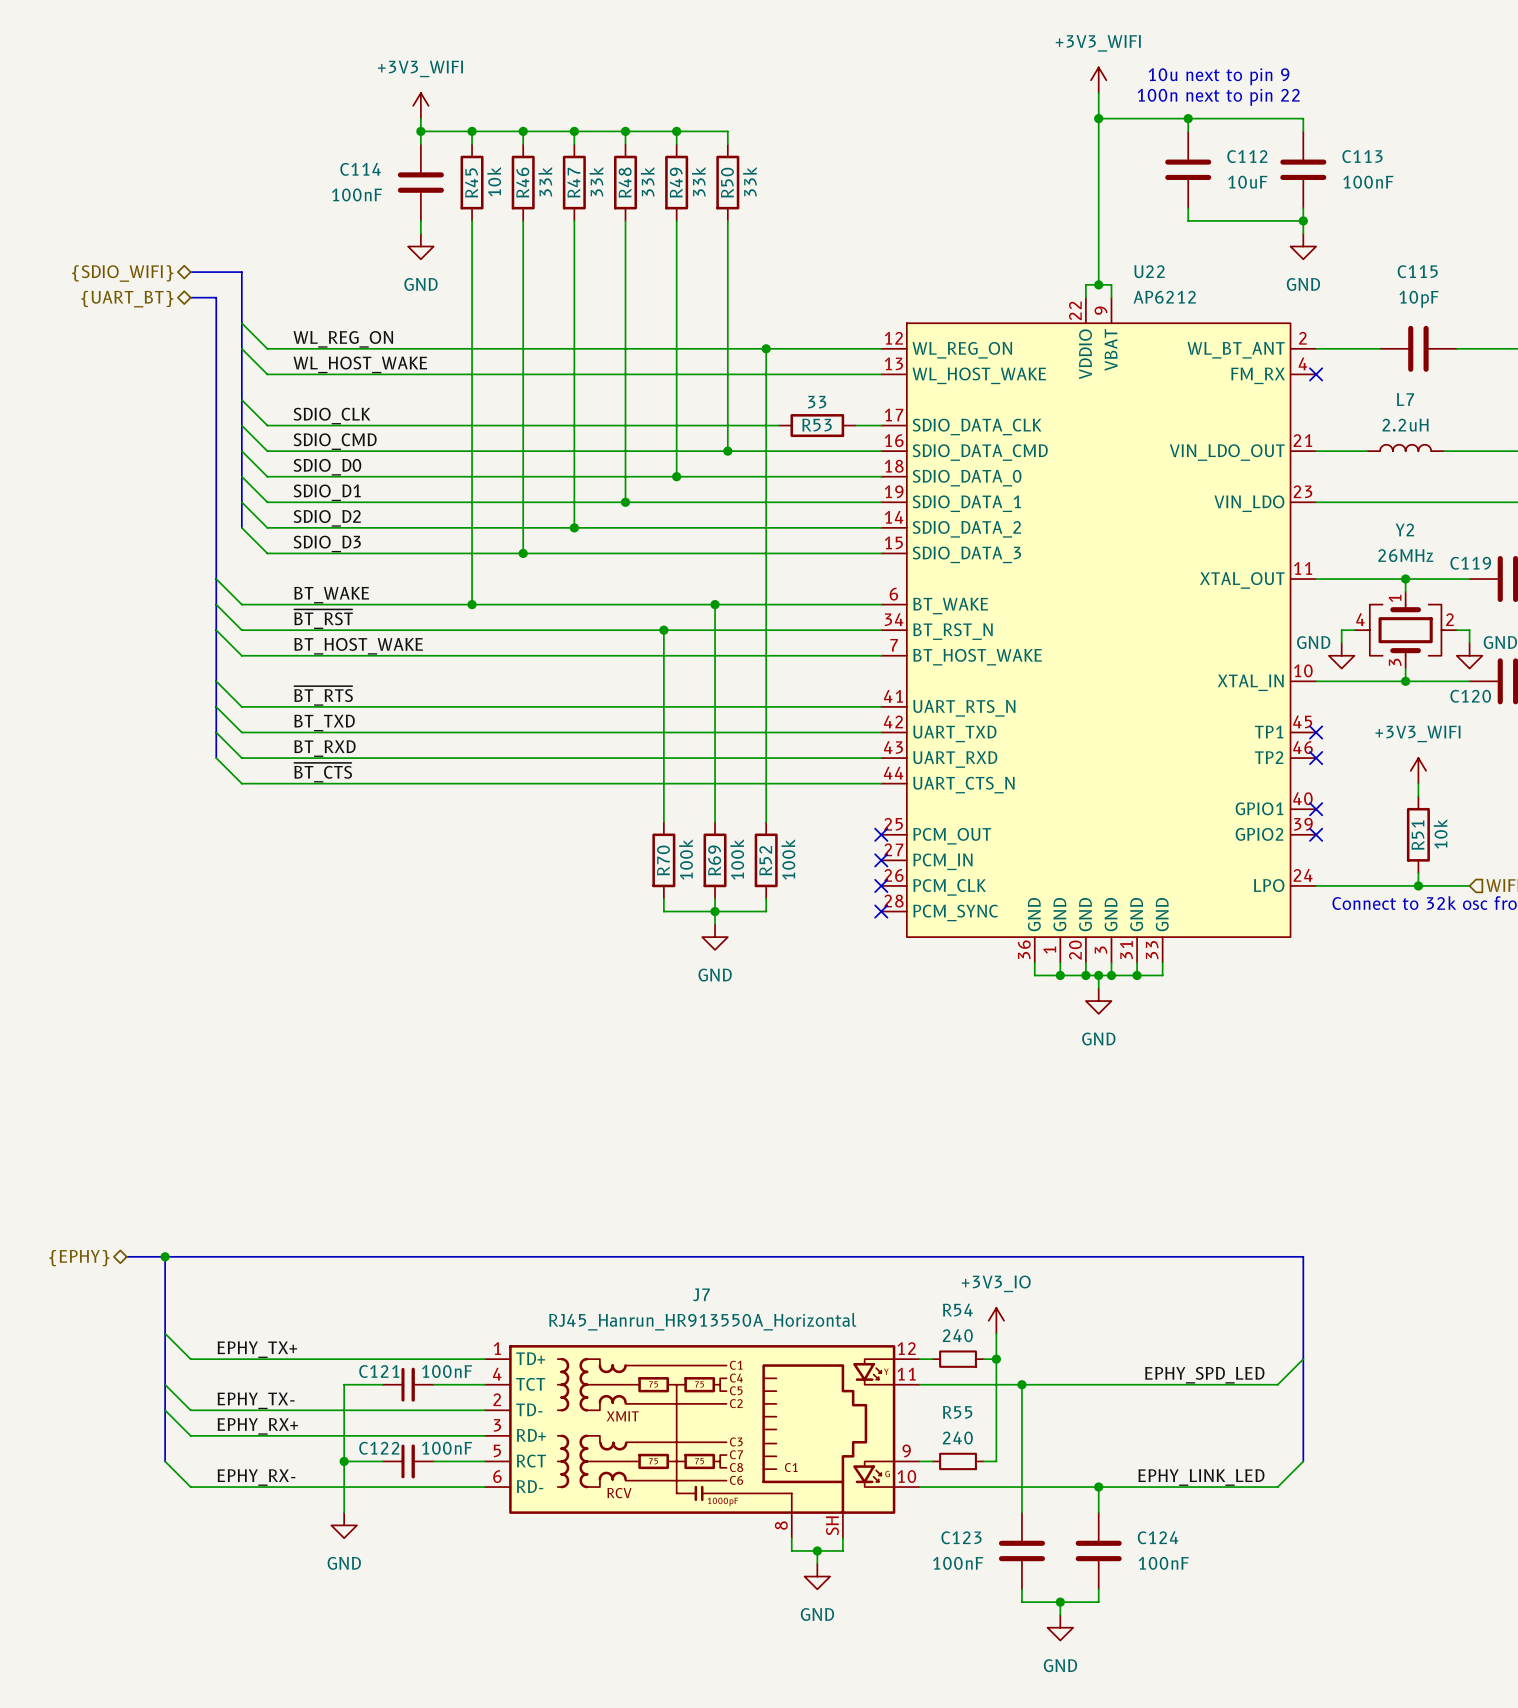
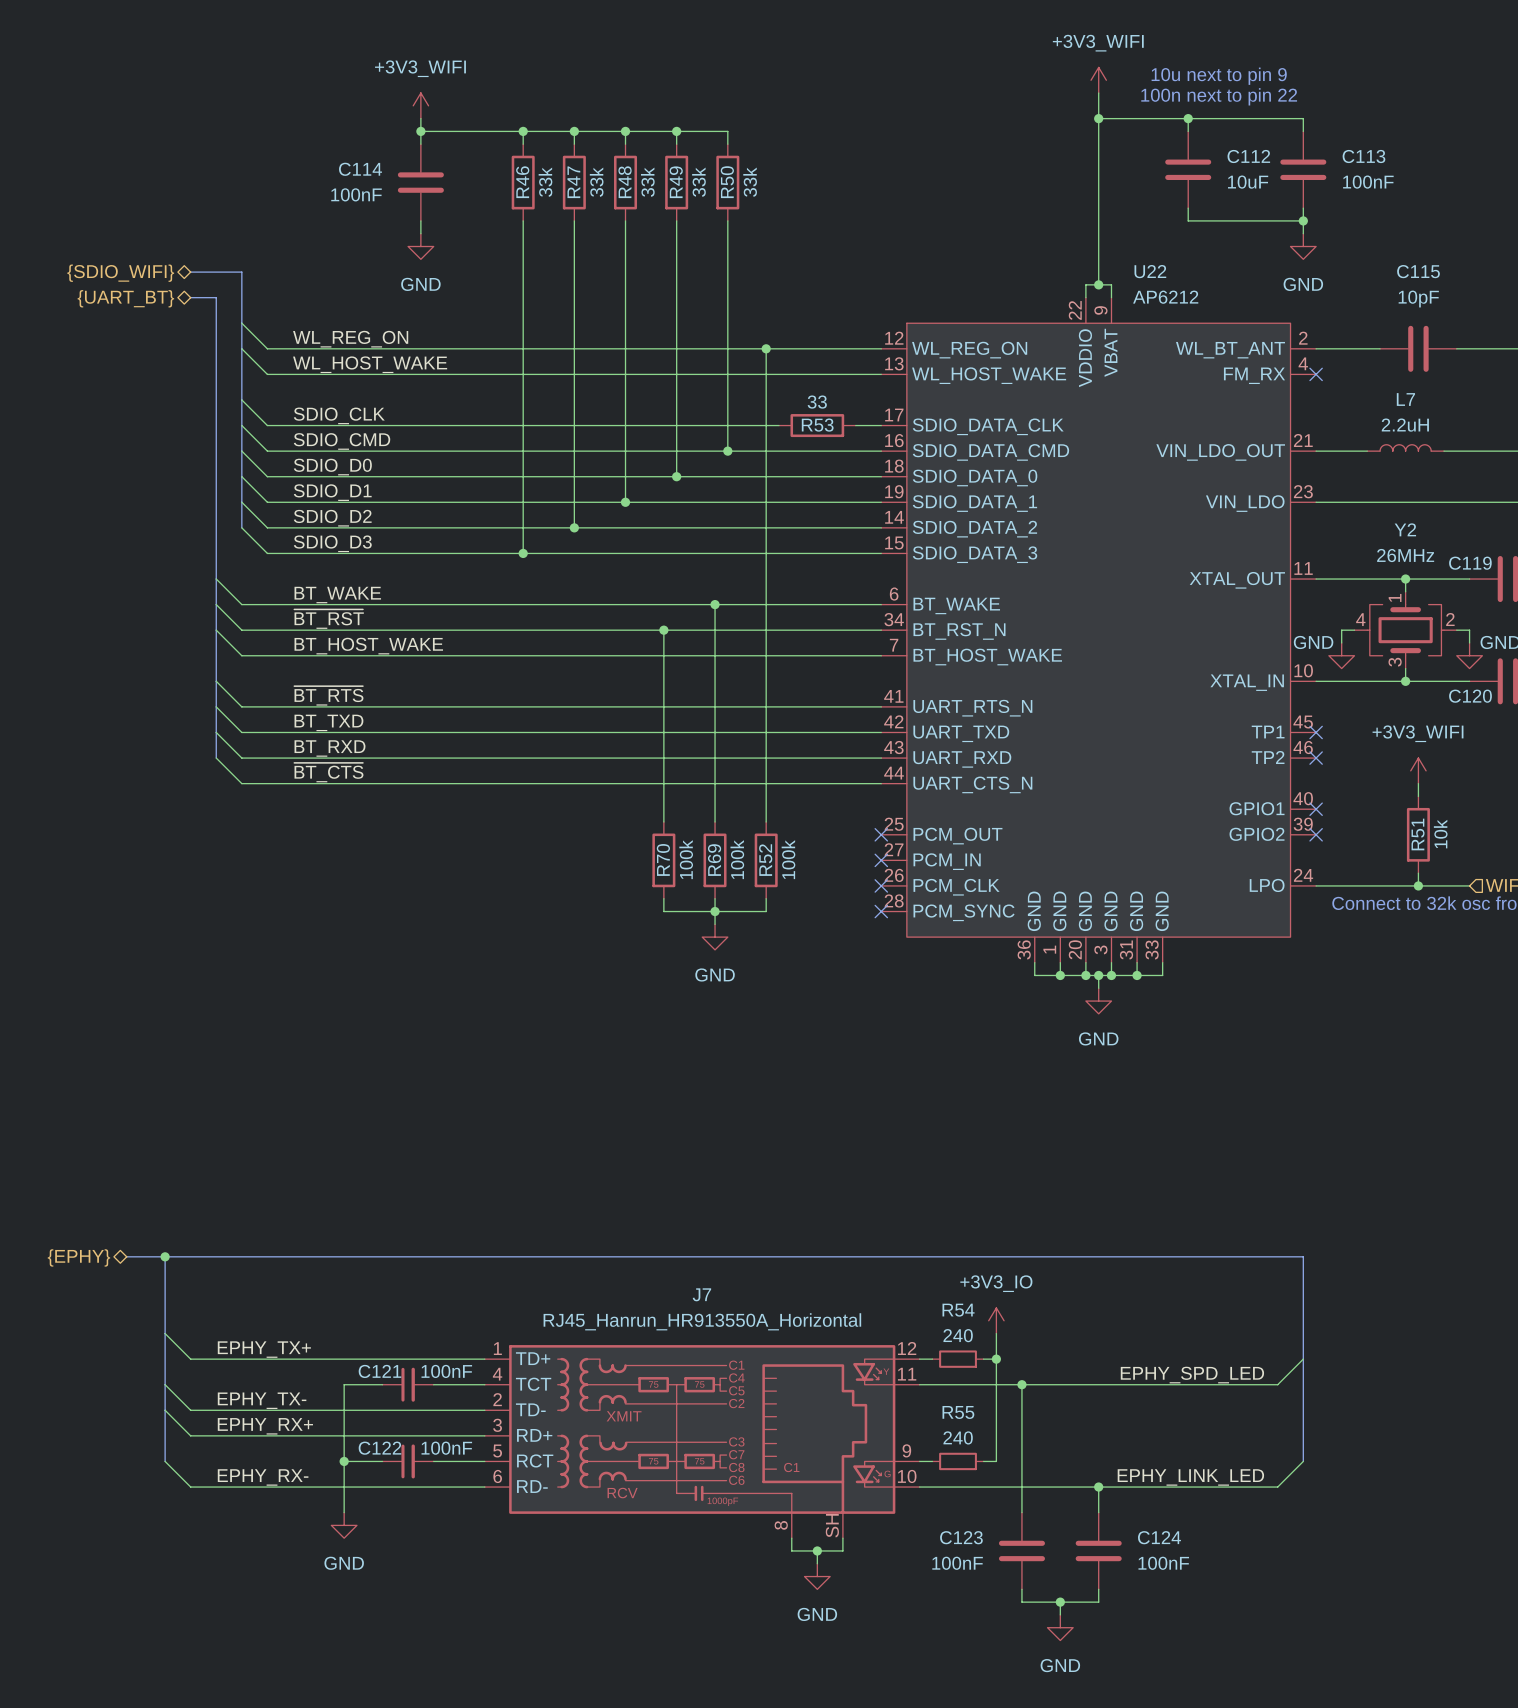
wire: (472, 131) (472, 144) -> none
junction: (472, 131) -> none
R45: 10k (472, 182) -> none
wire: (472, 220) (472, 604) -> none
junction: (472, 604) -> none

